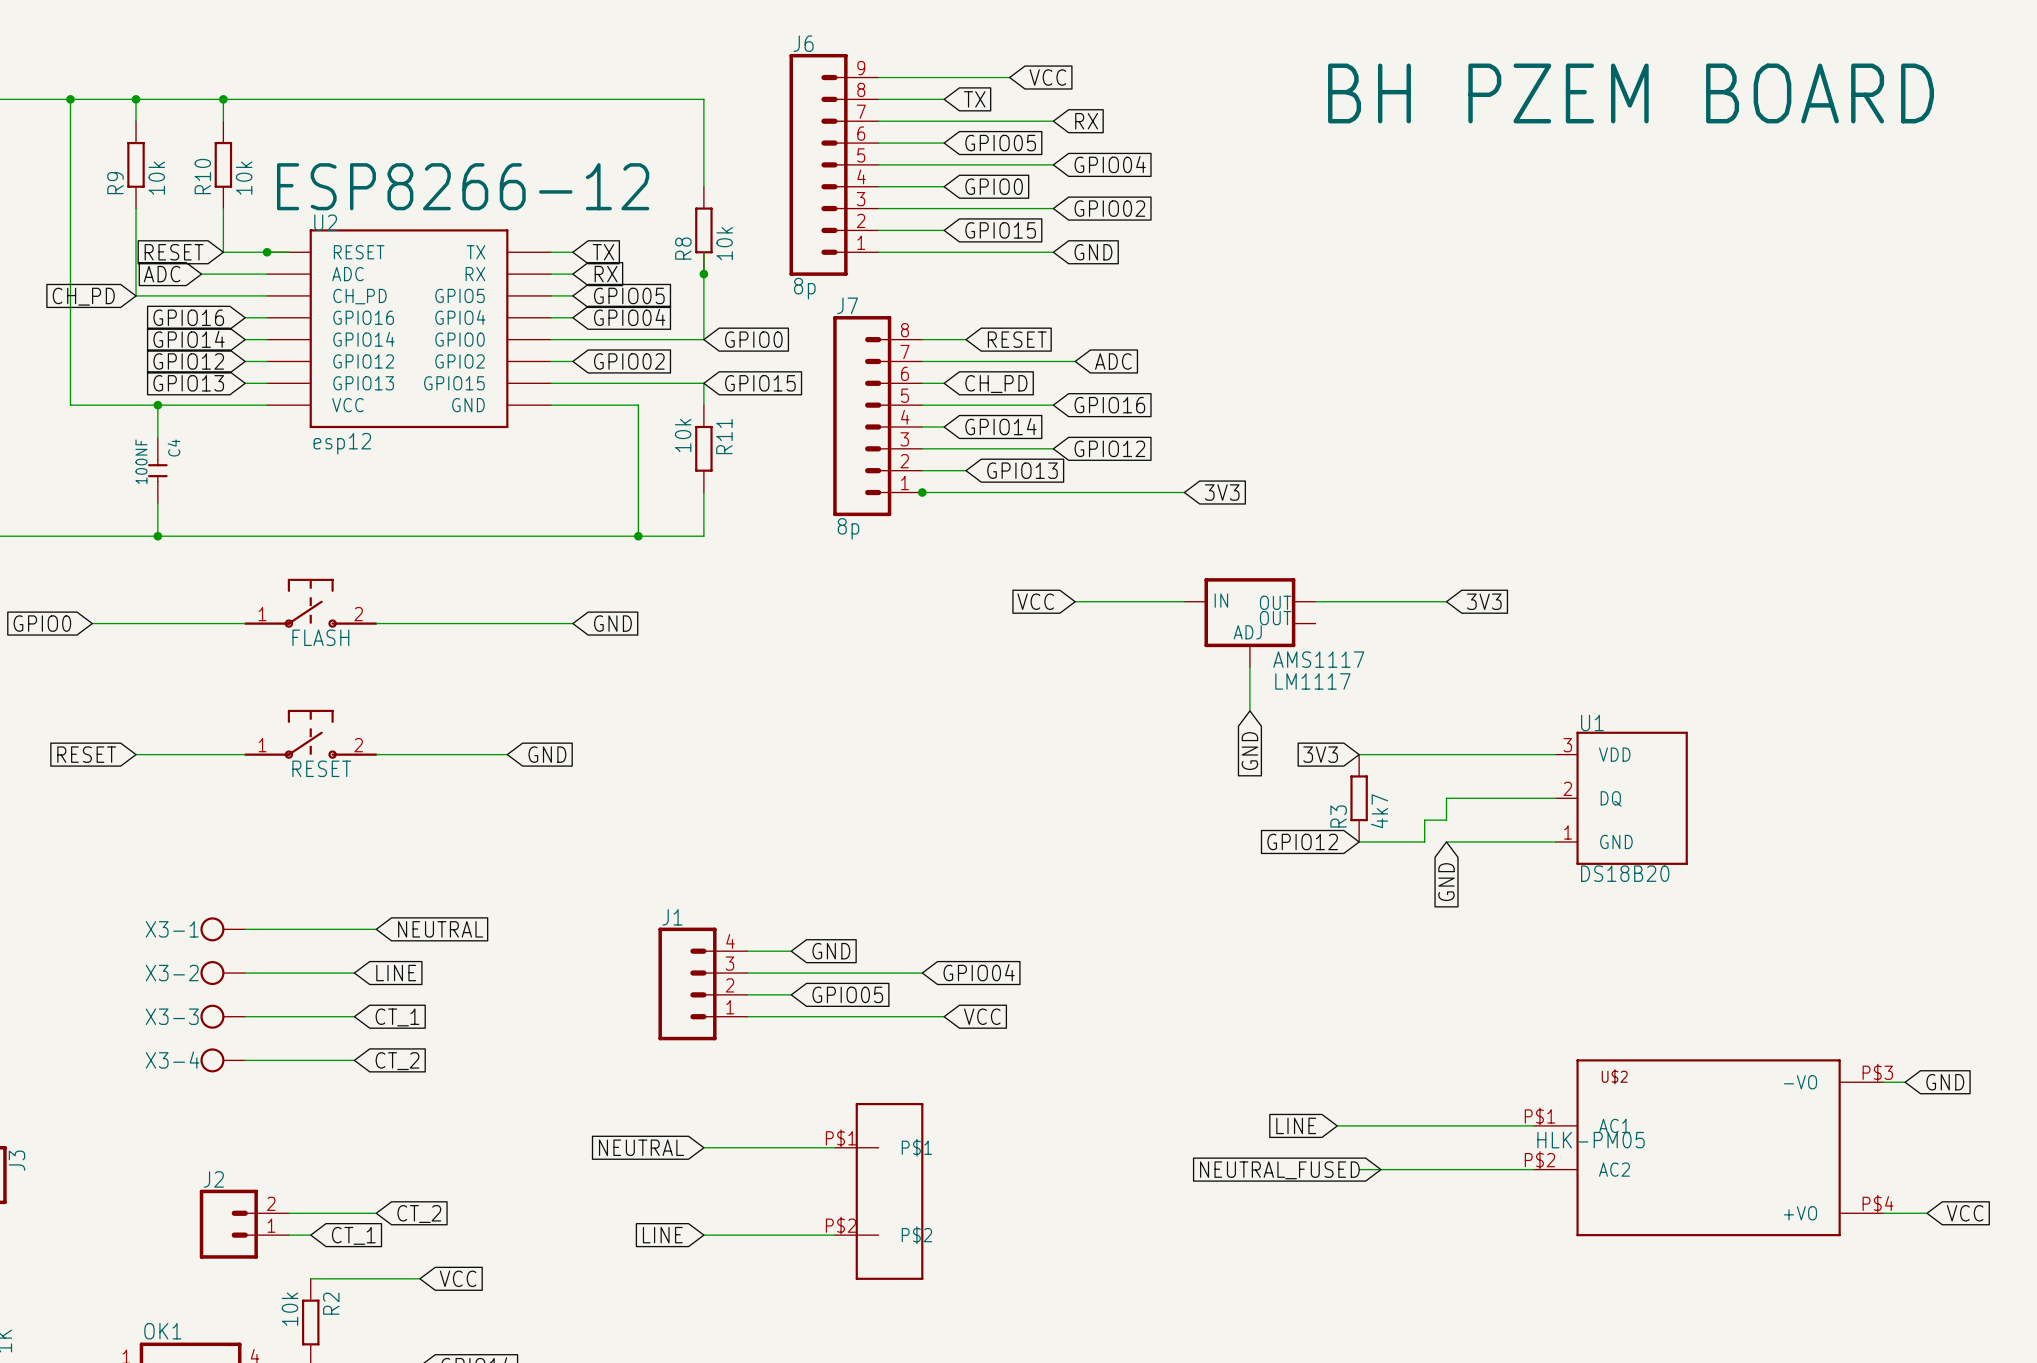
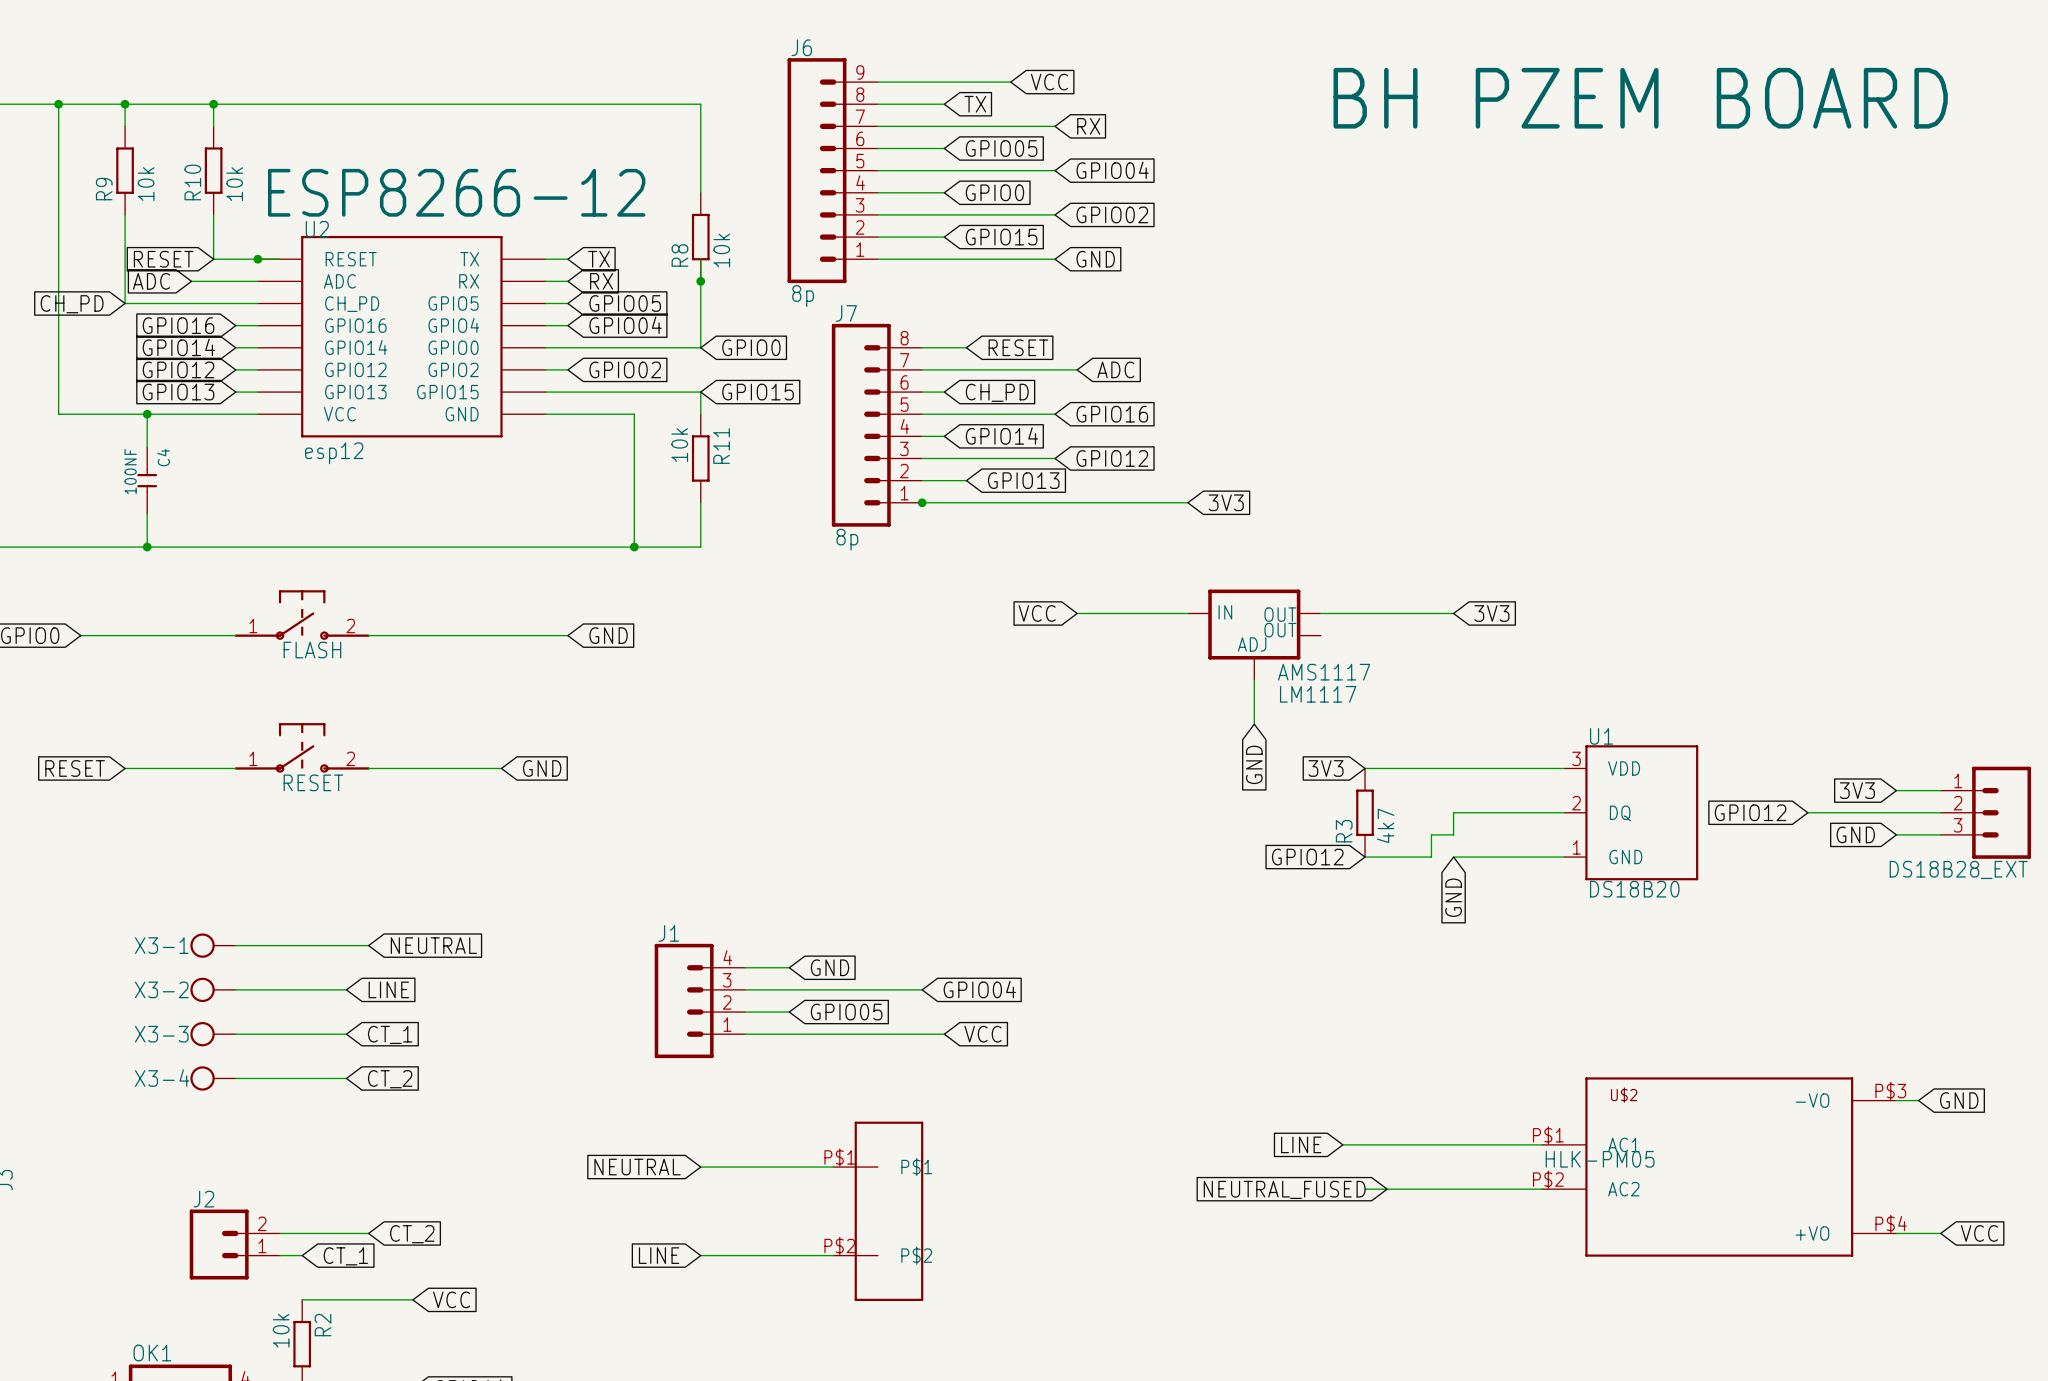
global label: none -> 3V3 (1857, 790)
wire: none -> (1896, 790) (1940, 790)
global label: none -> GPIO12 (1750, 812)
wire: none -> (1807, 812) (1940, 812)
DS18B28_EXT: none -> (1985, 812)
global label: none -> GND (1855, 834)
wire: none -> (1896, 834) (1940, 834)

